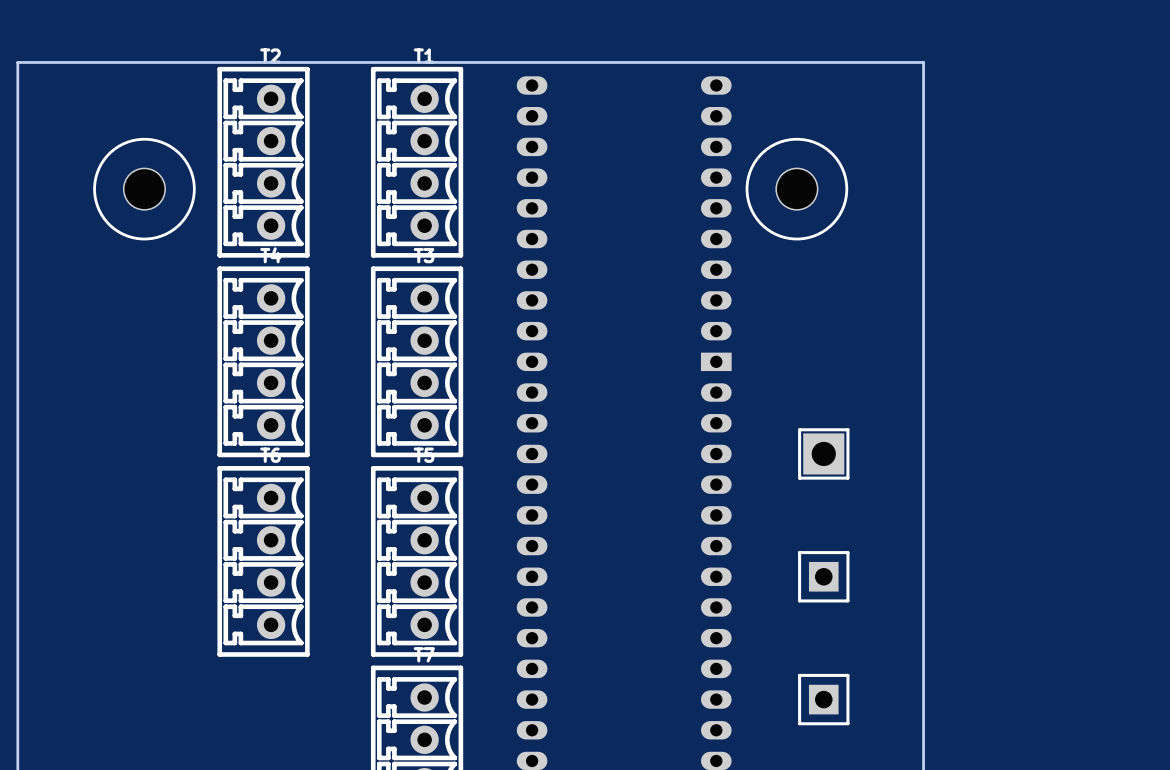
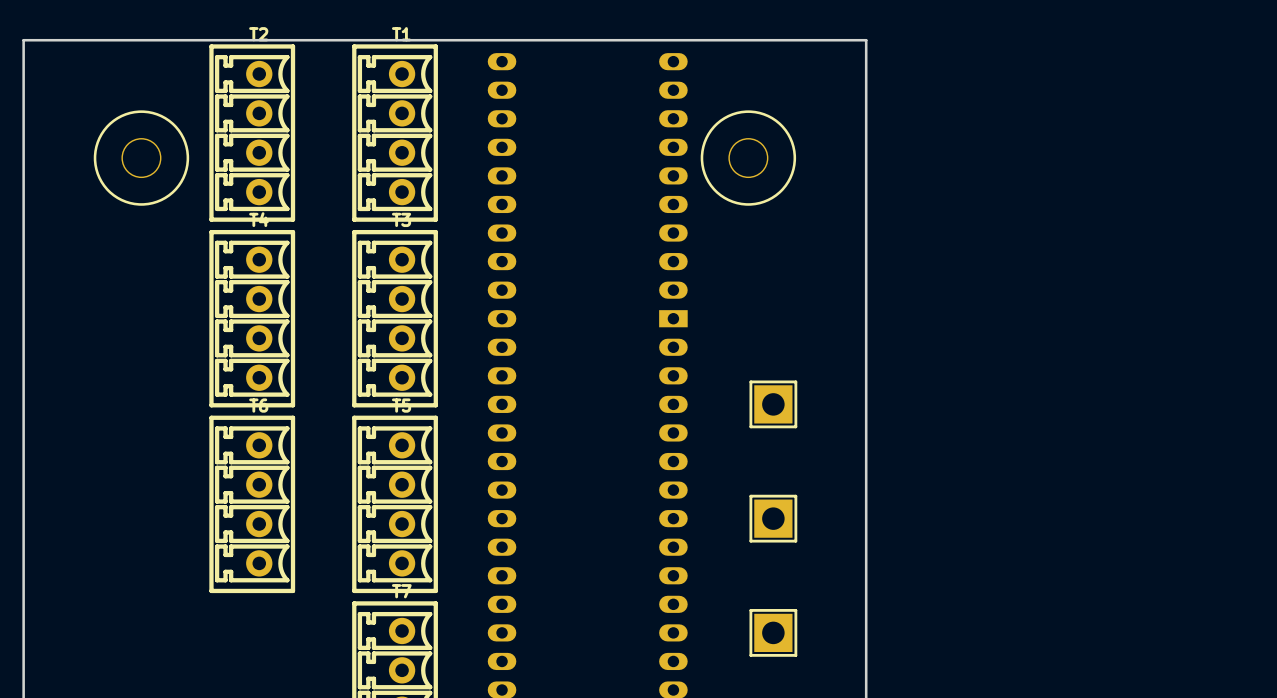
part footprint: [798, 551, 850, 603] -> [749, 494, 798, 543]
part footprint: [798, 673, 850, 726] -> [749, 609, 798, 657]

